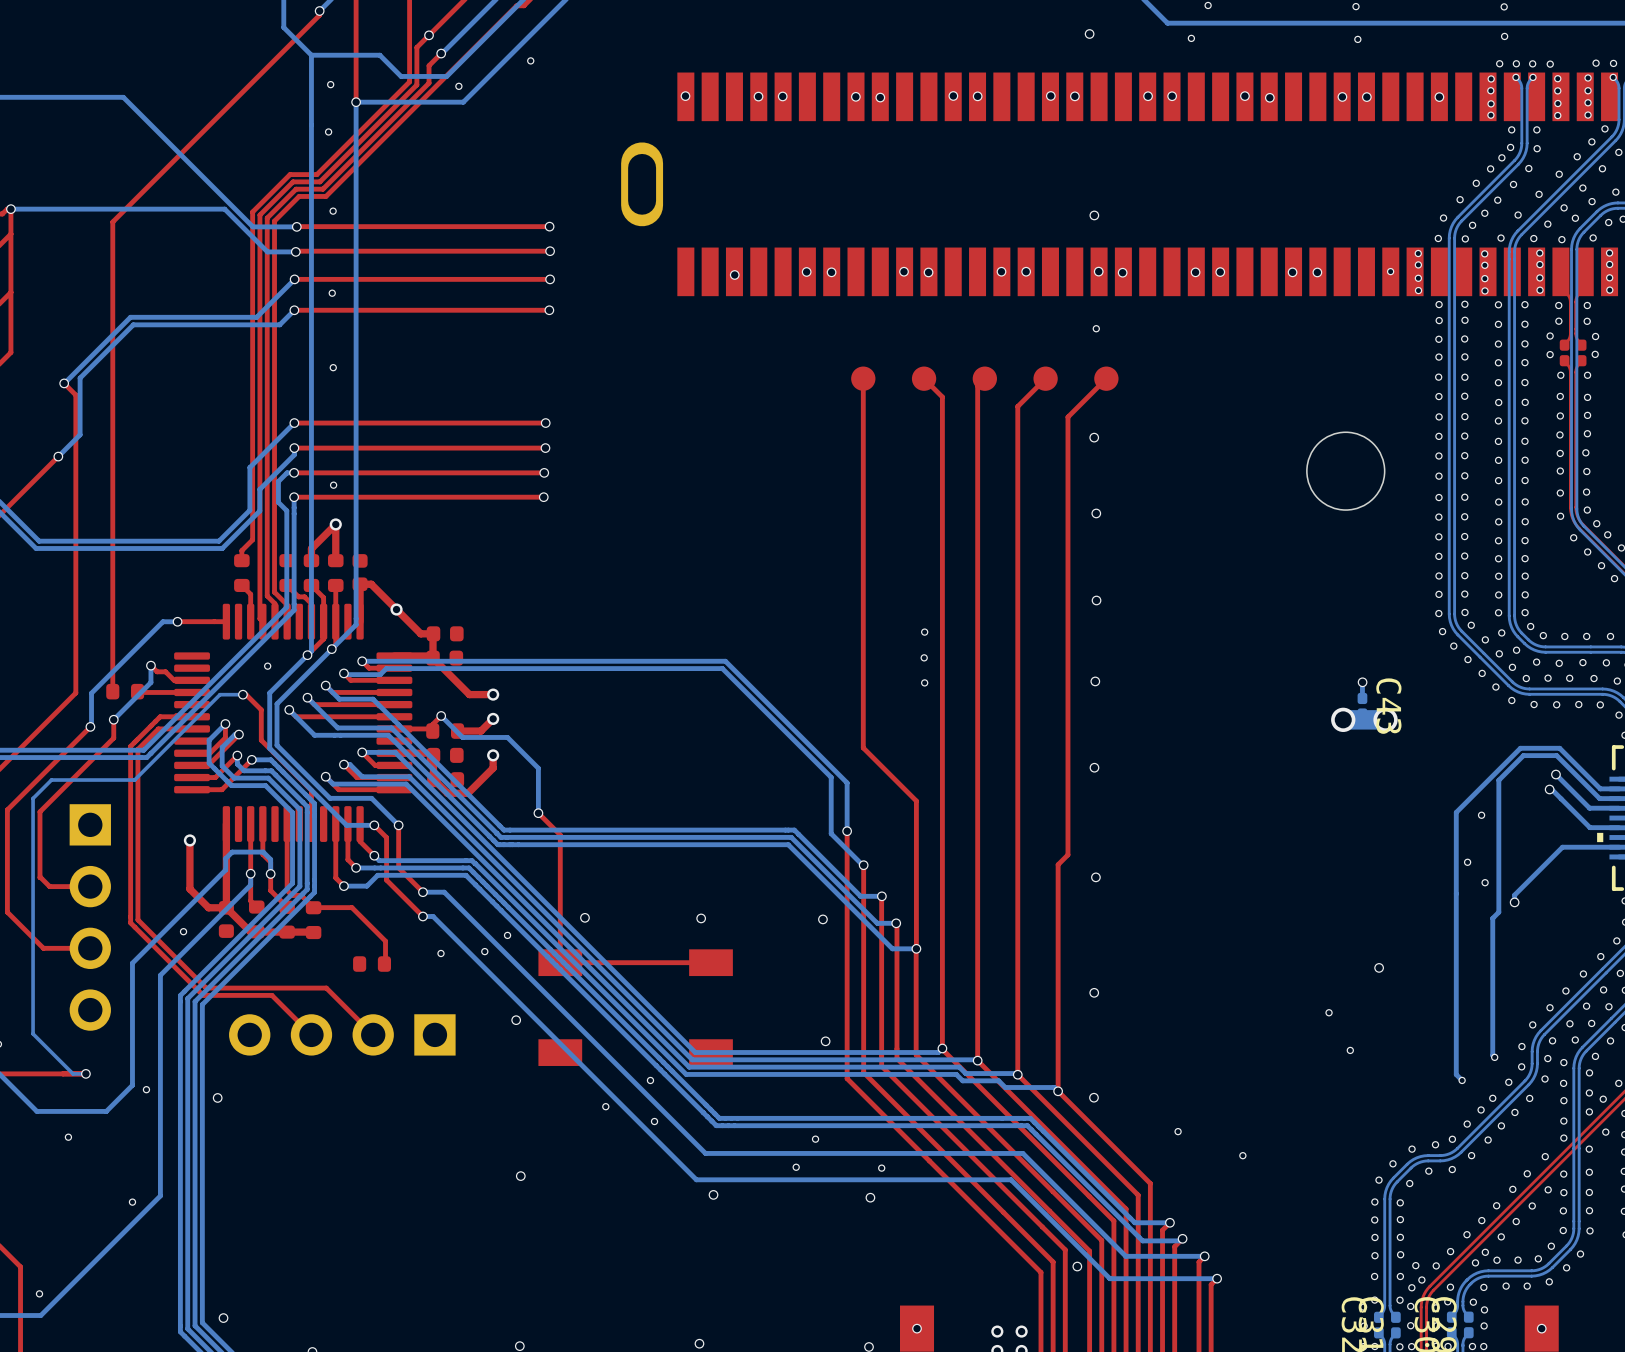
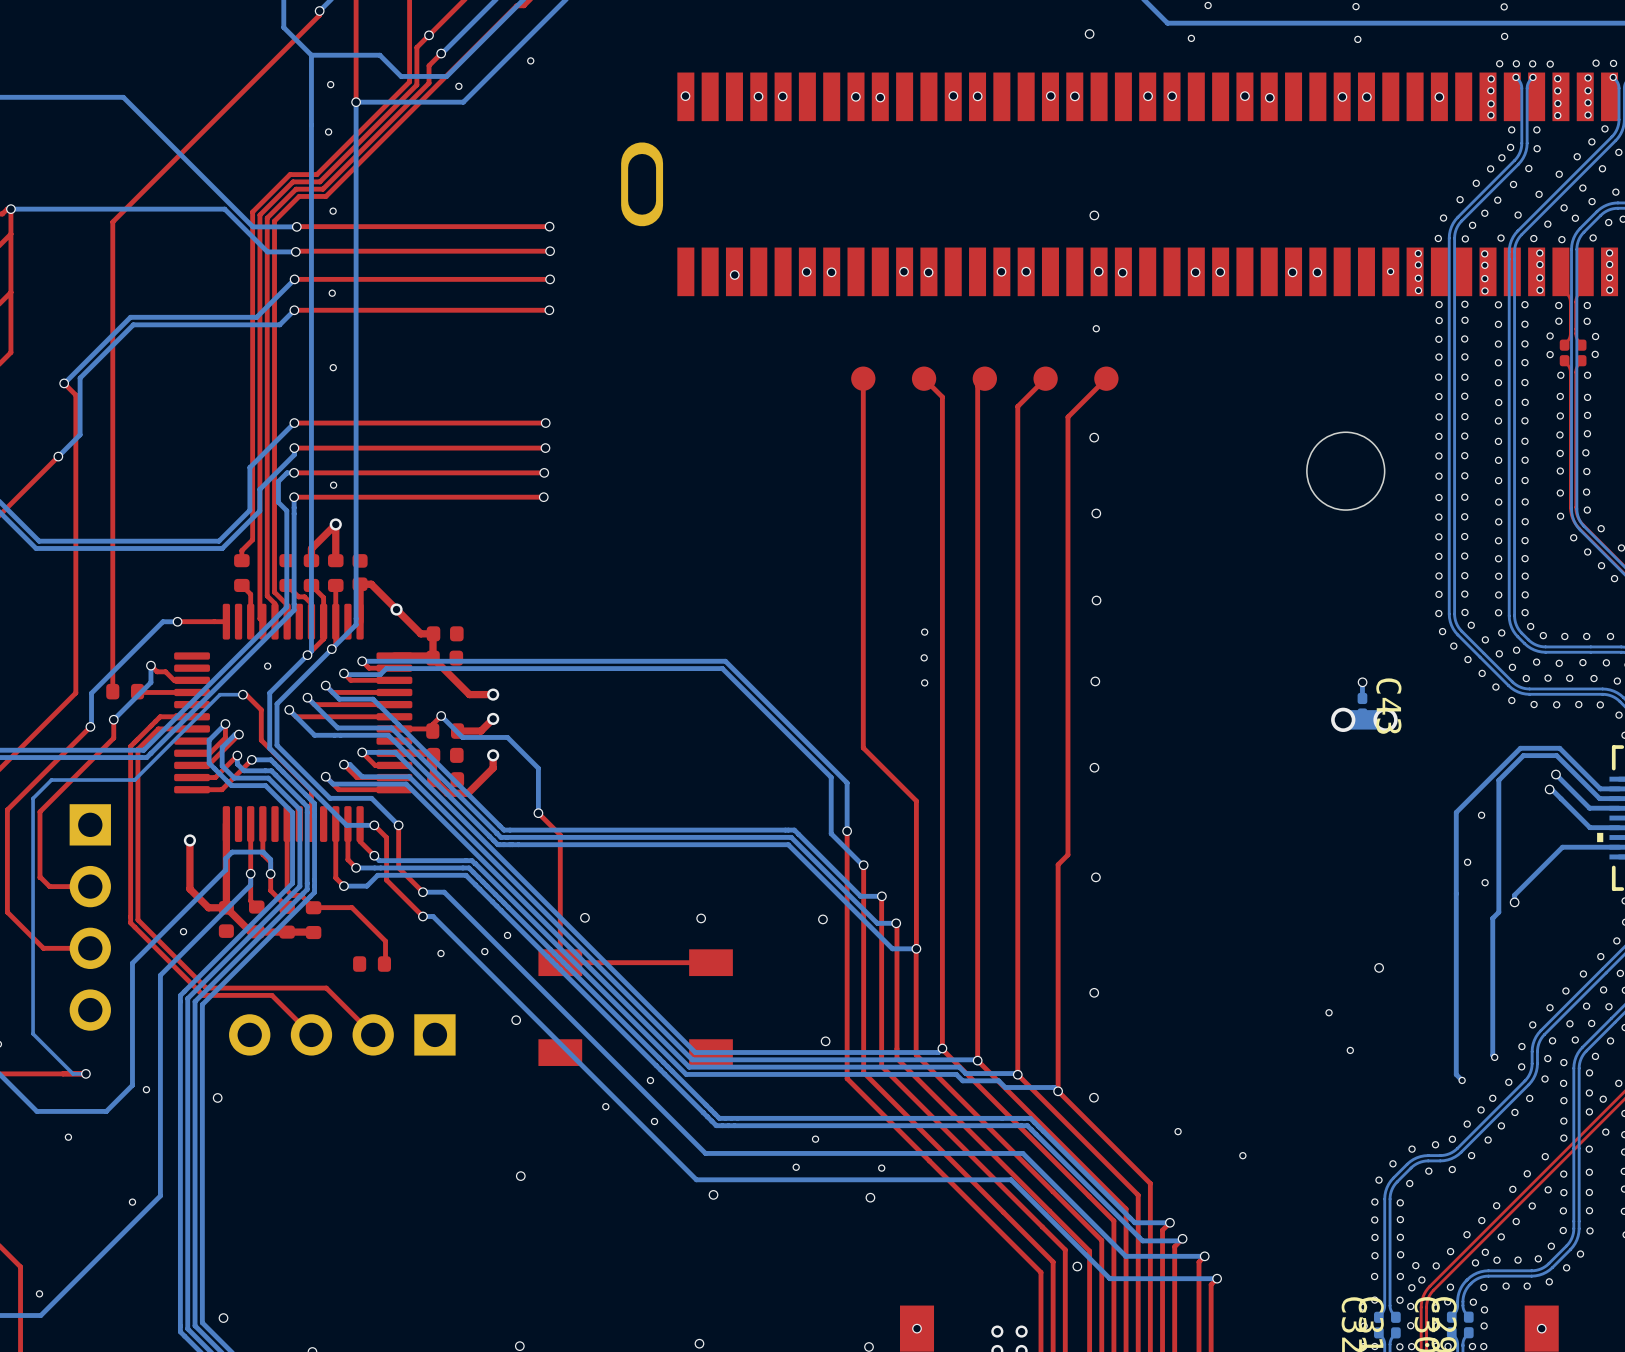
via: (1596, 523) -> none
via: none -> (1601, 528)
via: (1607, 534) -> none

